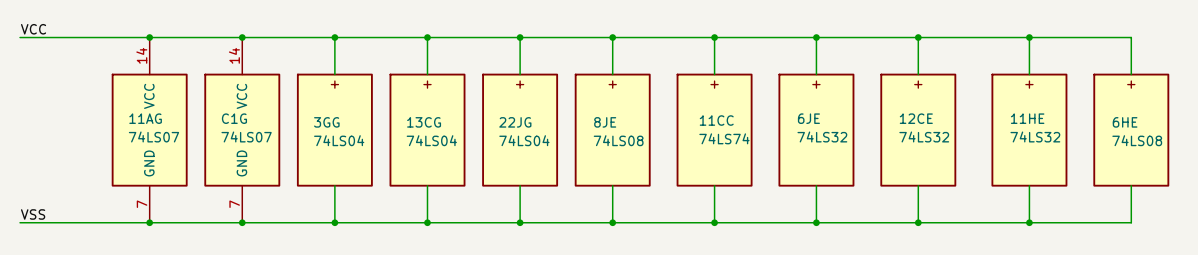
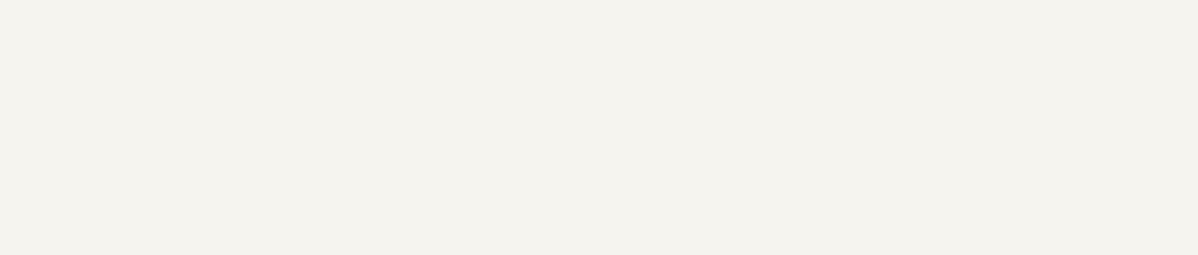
label: VCC (33, 29) -> none
wire: (20, 37) (1131, 37) (1131, 74) -> none
junction: (149, 37) -> none
junction: (242, 37) -> none
wire: (334, 37) (334, 74) -> none
junction: (334, 37) -> none
wire: (427, 37) (427, 74) -> none
junction: (427, 37) -> none
wire: (520, 37) (520, 74) -> none
junction: (520, 37) -> none
wire: (612, 37) (612, 74) -> none
junction: (612, 37) -> none
wire: (714, 37) (714, 74) -> none
junction: (714, 37) -> none
wire: (816, 37) (816, 74) -> none
junction: (816, 37) -> none
wire: (918, 37) (918, 74) -> none
junction: (918, 37) -> none
wire: (1029, 37) (1029, 74) -> none
junction: (1029, 37) -> none
11AG: 74LS07 (149, 130) -> none
C1G: 74LS07 (242, 130) -> none
3GG: 74LS04 (334, 130) -> none
13CG: 74LS04 (427, 130) -> none
22JG: 74LS04 (520, 130) -> none
8JE: 74LS08 (612, 130) -> none
11CC: 74LS74 (714, 130) -> none
6JE: 74LS32 (816, 130) -> none
12CE: 74LS32 (918, 130) -> none
11HE: 74LS32 (1029, 130) -> none
6HE: 74LS08 (1131, 130) -> none
wire: (334, 185) (334, 222) -> none
wire: (427, 185) (427, 222) -> none
wire: (520, 185) (520, 222) -> none
wire: (612, 185) (612, 222) -> none
wire: (714, 185) (714, 222) -> none
wire: (816, 185) (816, 222) -> none
wire: (918, 185) (918, 222) -> none
wire: (1029, 185) (1029, 222) -> none
wire: (1131, 185) (1131, 222) (20, 222) -> none
label: VSS (33, 214) -> none
junction: (149, 222) -> none
junction: (242, 222) -> none
junction: (334, 222) -> none
junction: (427, 222) -> none
junction: (520, 222) -> none
junction: (612, 222) -> none
junction: (714, 222) -> none
junction: (816, 222) -> none
junction: (918, 222) -> none
junction: (1029, 222) -> none

